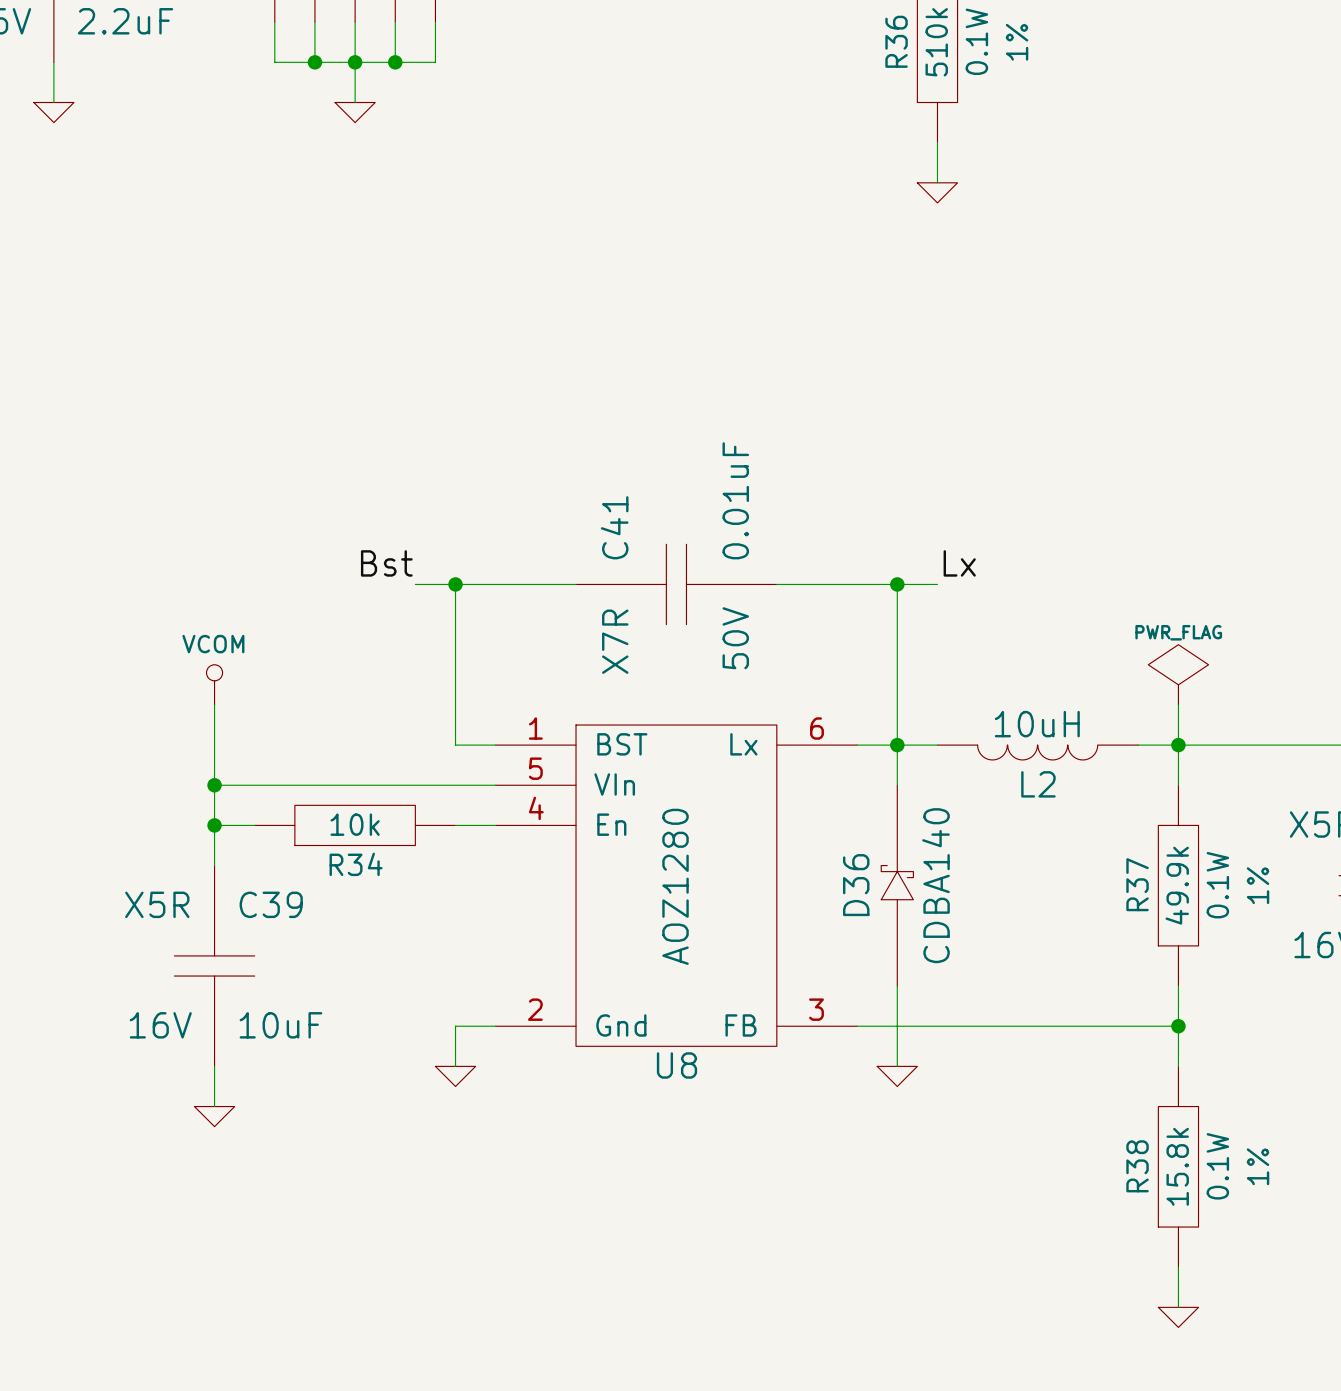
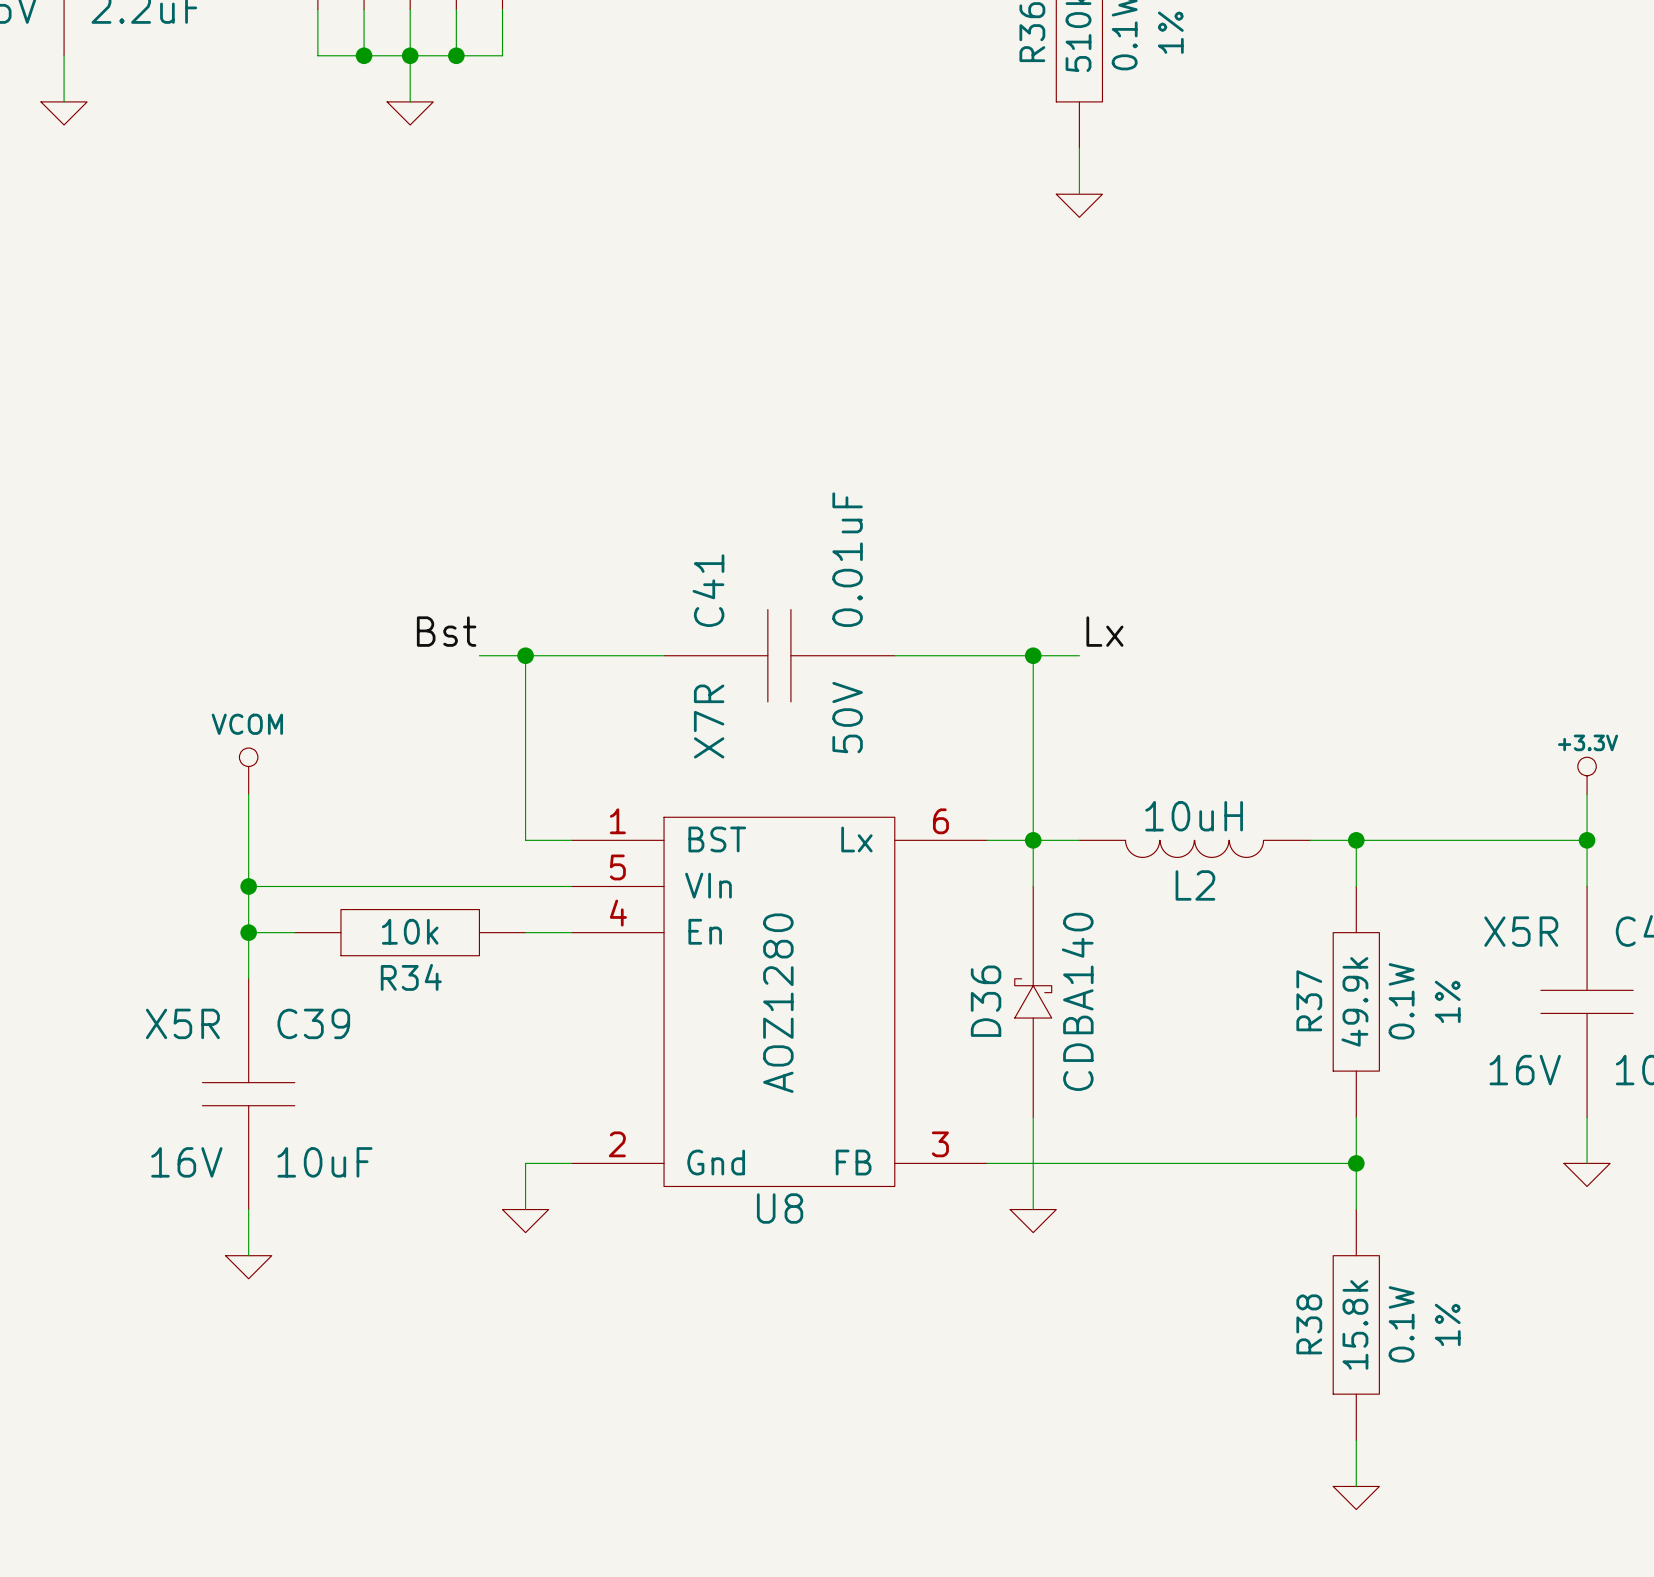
power symbol: PWR_FLAG (1178, 674) -> none
wire: (1178, 704) (1178, 745) -> none

